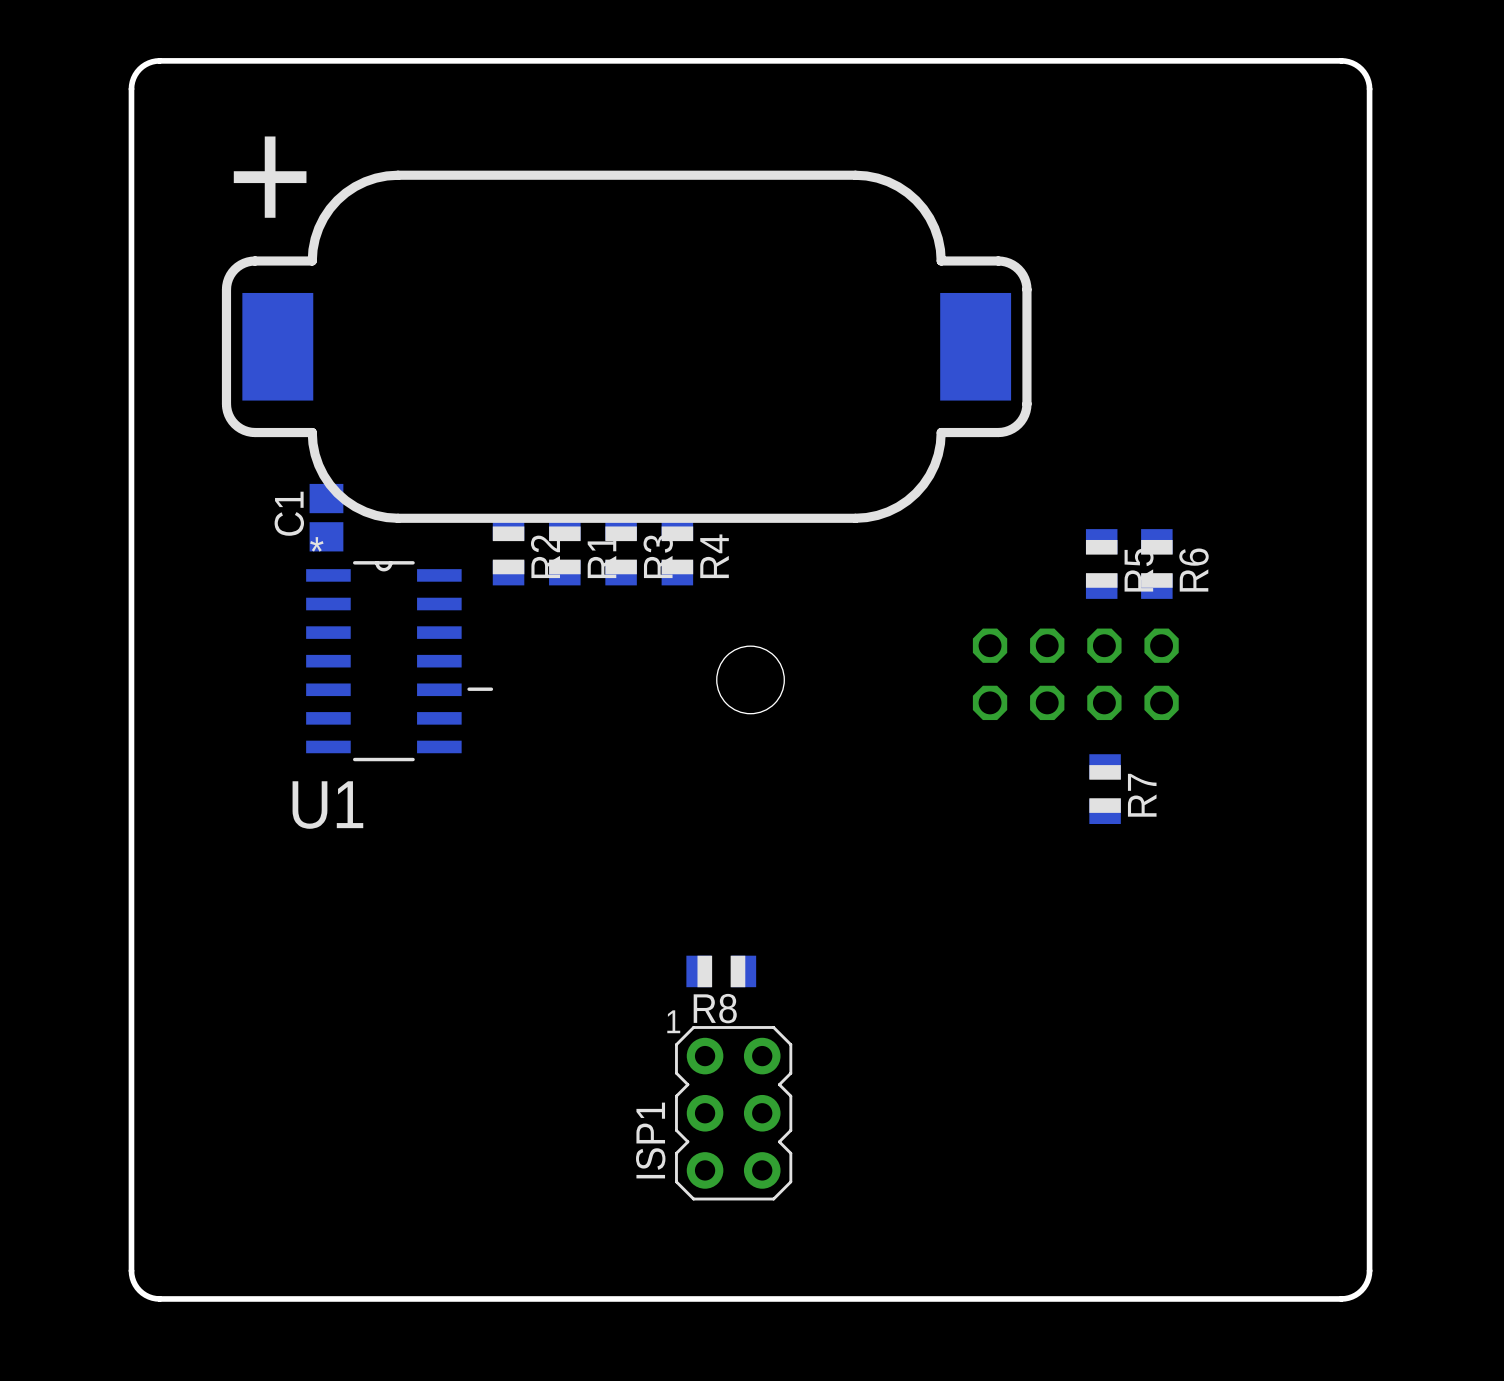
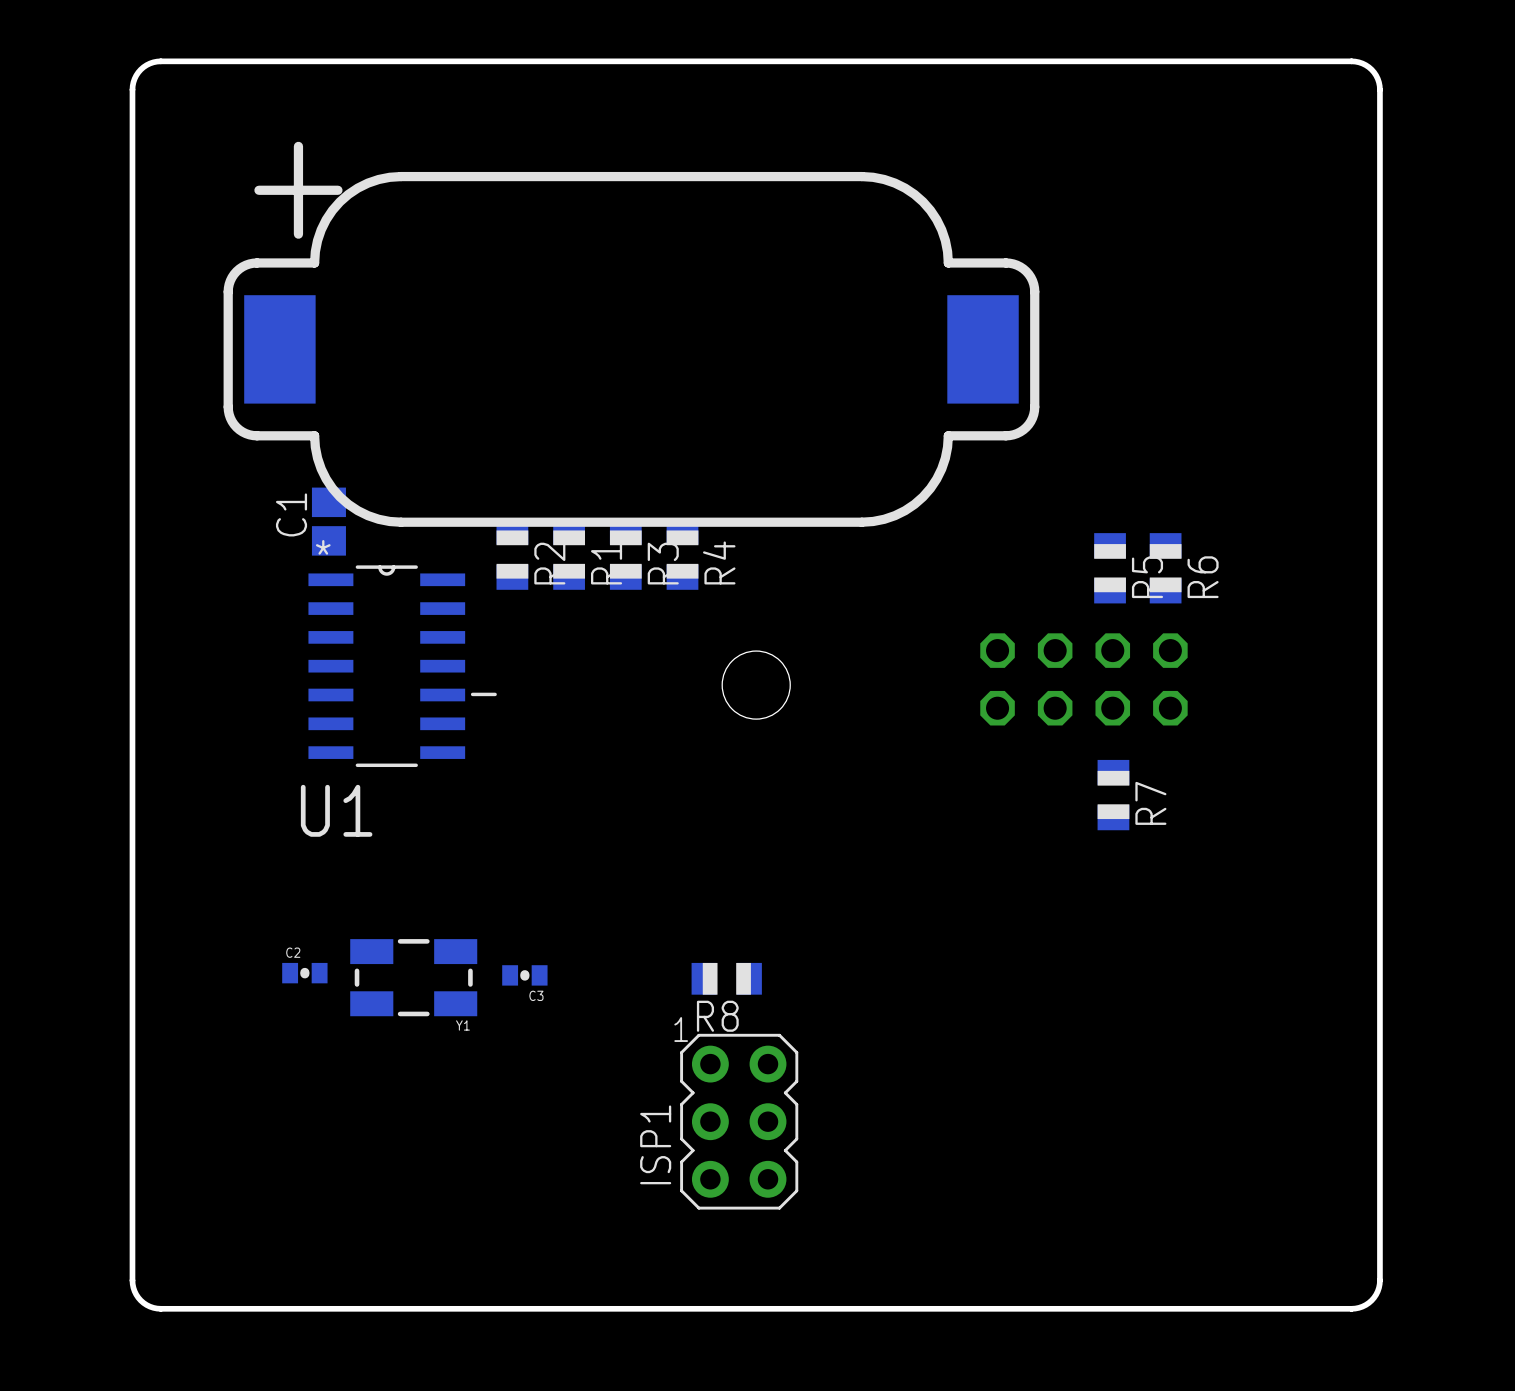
C2: none -> (304, 973)
C3: none -> (524, 975)
Y1: none -> (413, 977)

